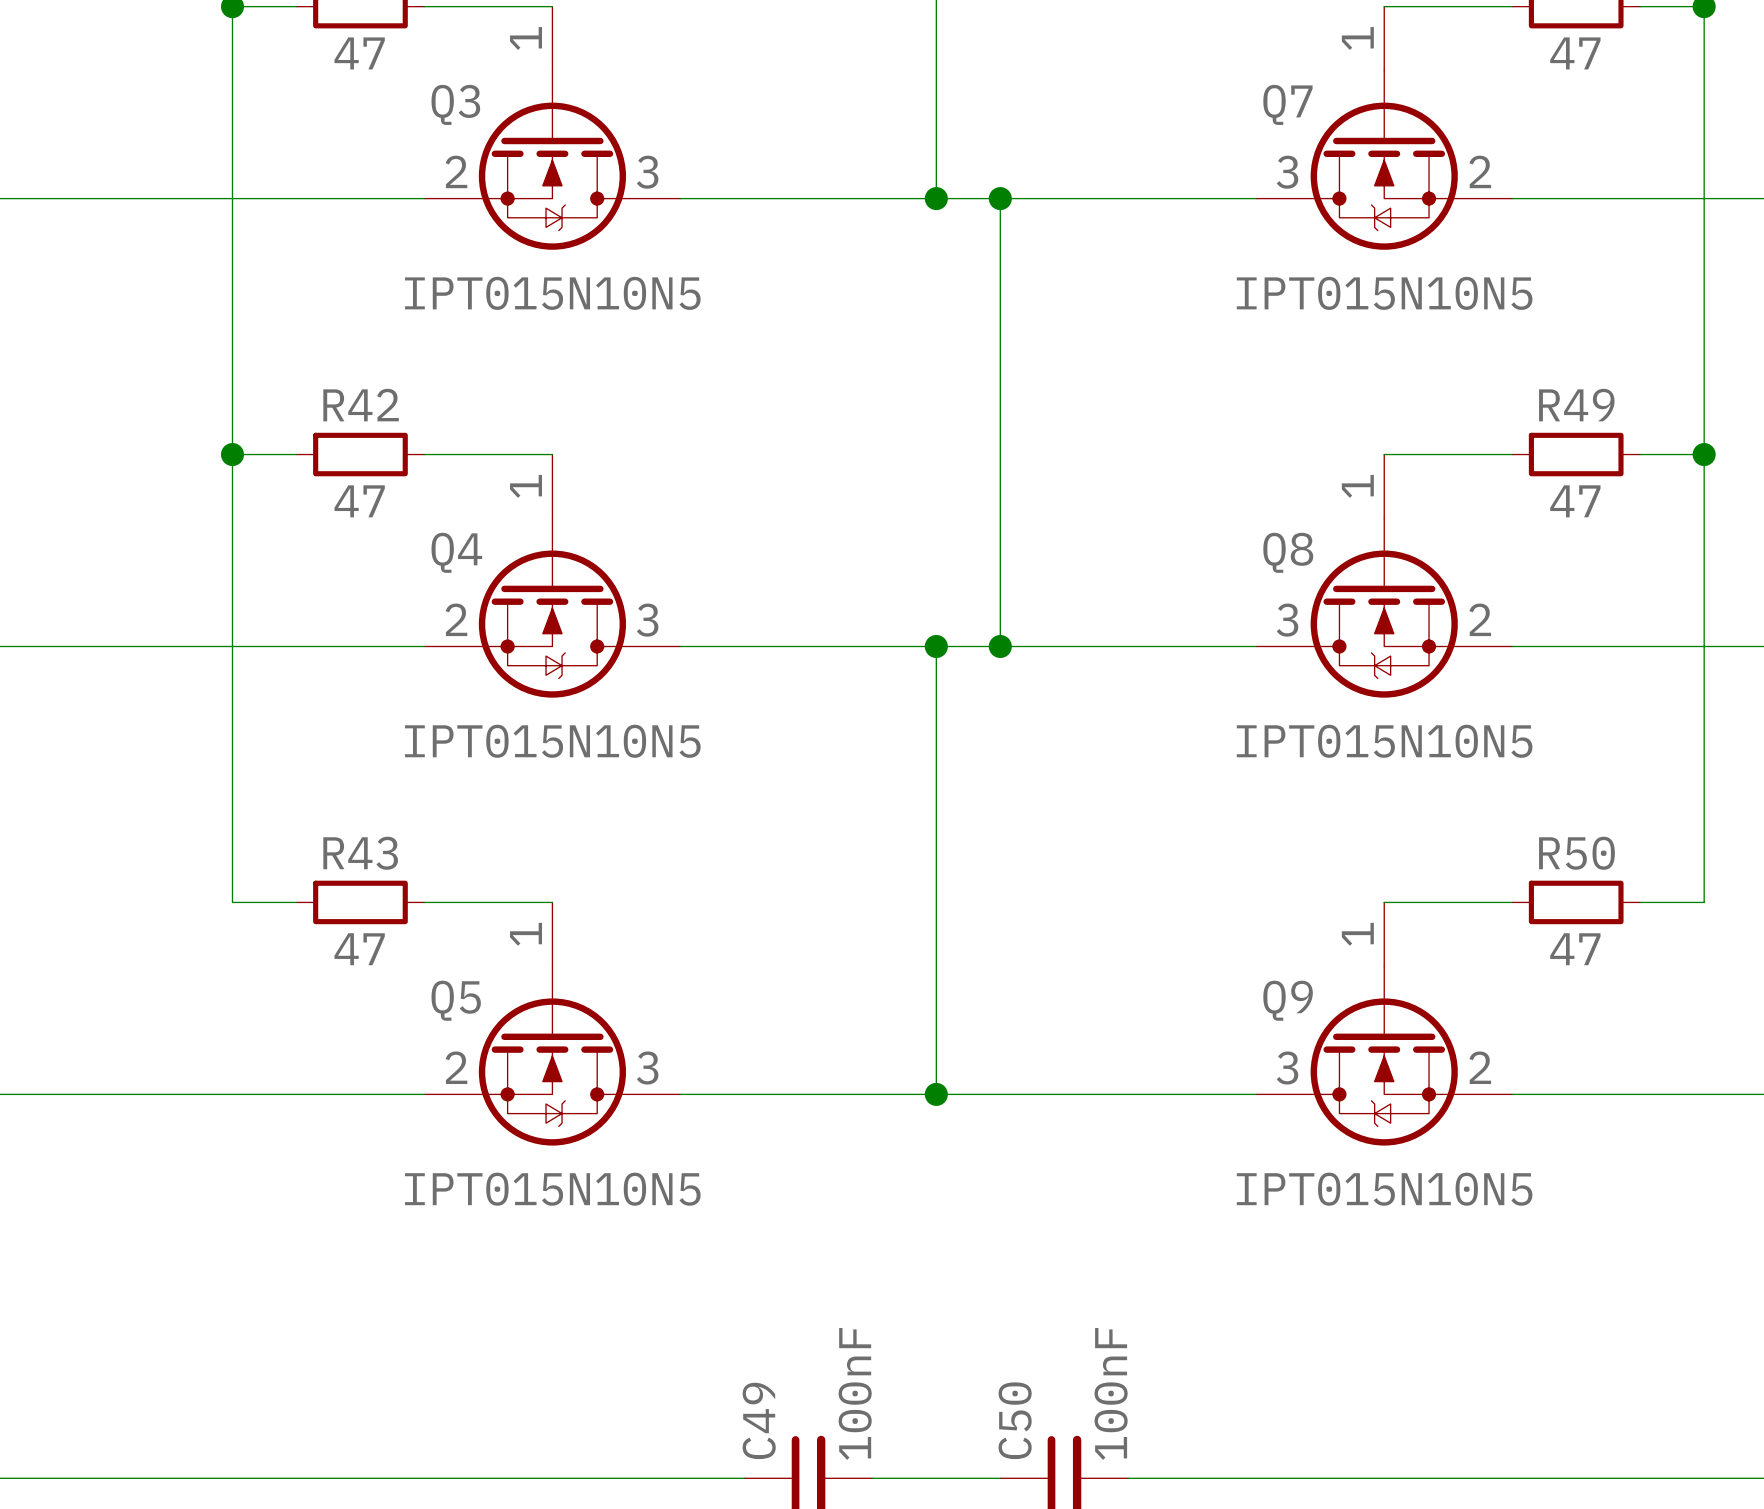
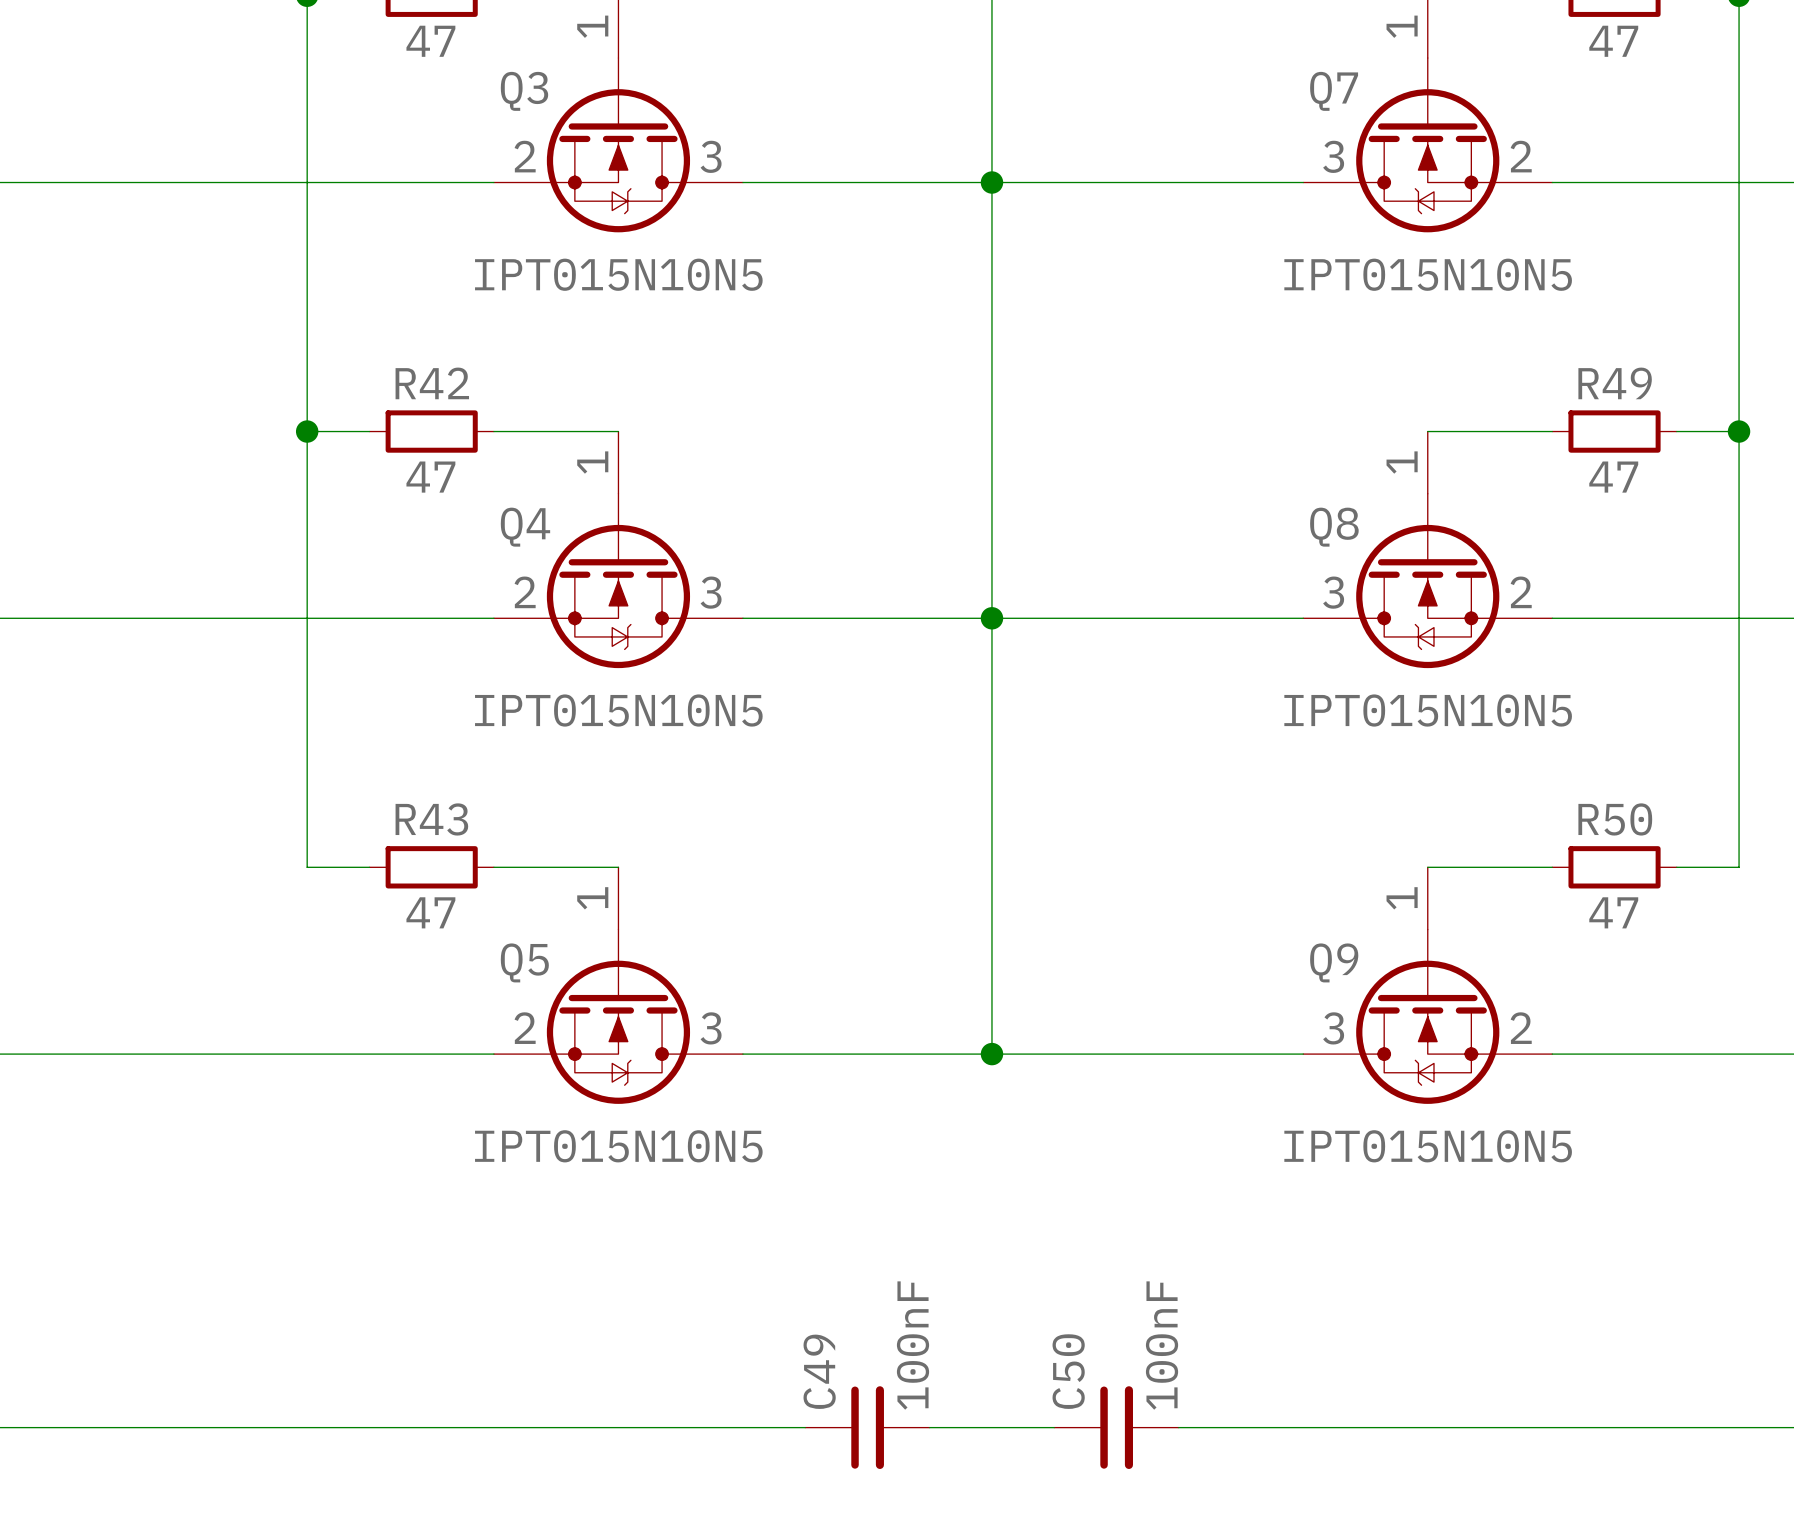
wire: (1000, 198) (1000, 646) -> (991, 182) (991, 618)
junction: (1000, 198) -> none
junction: (1000, 646) -> none

